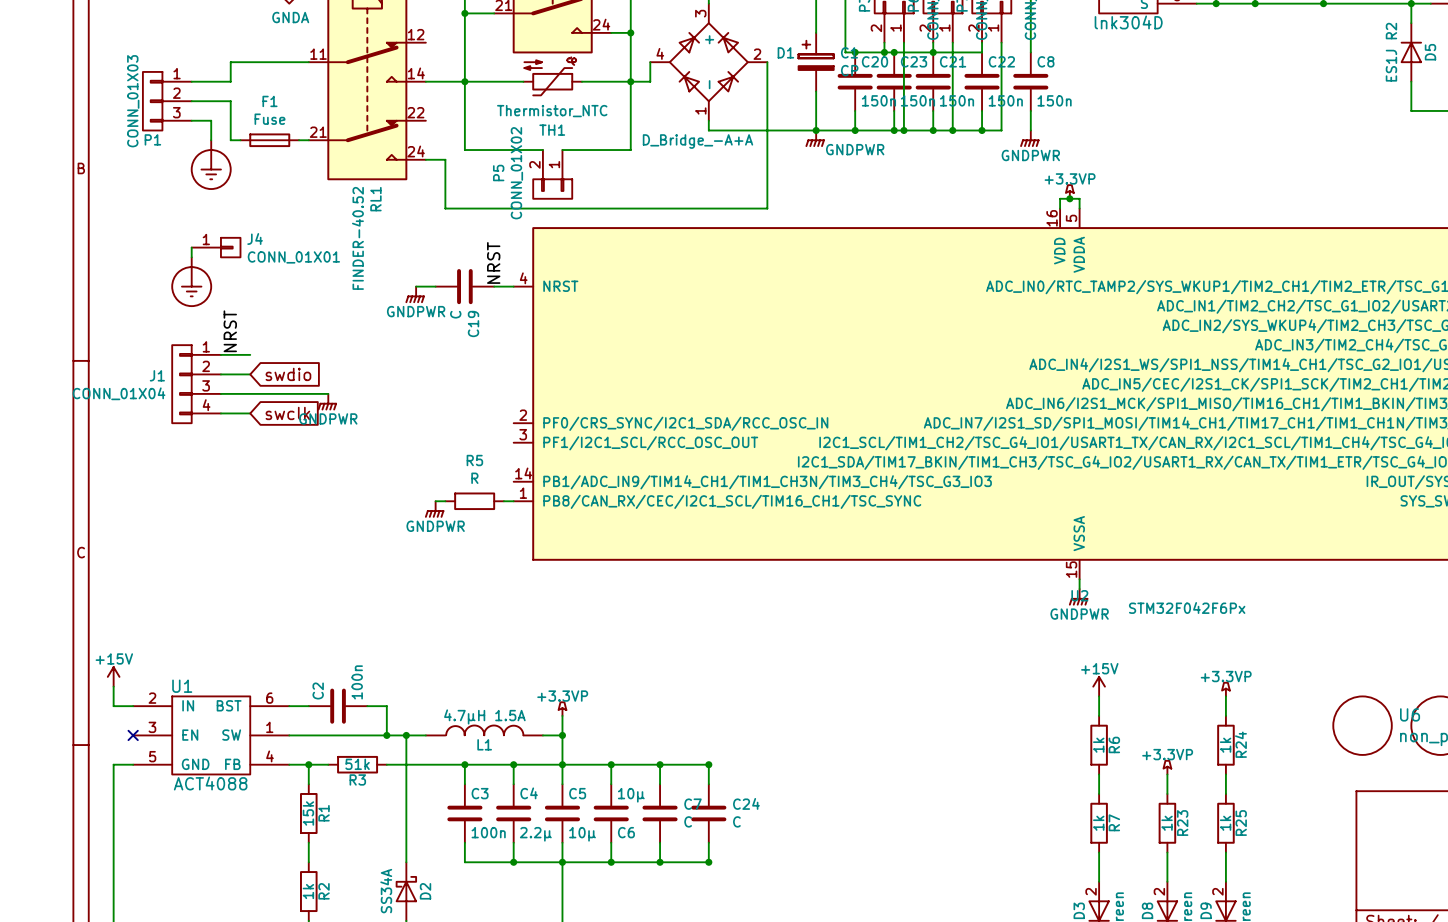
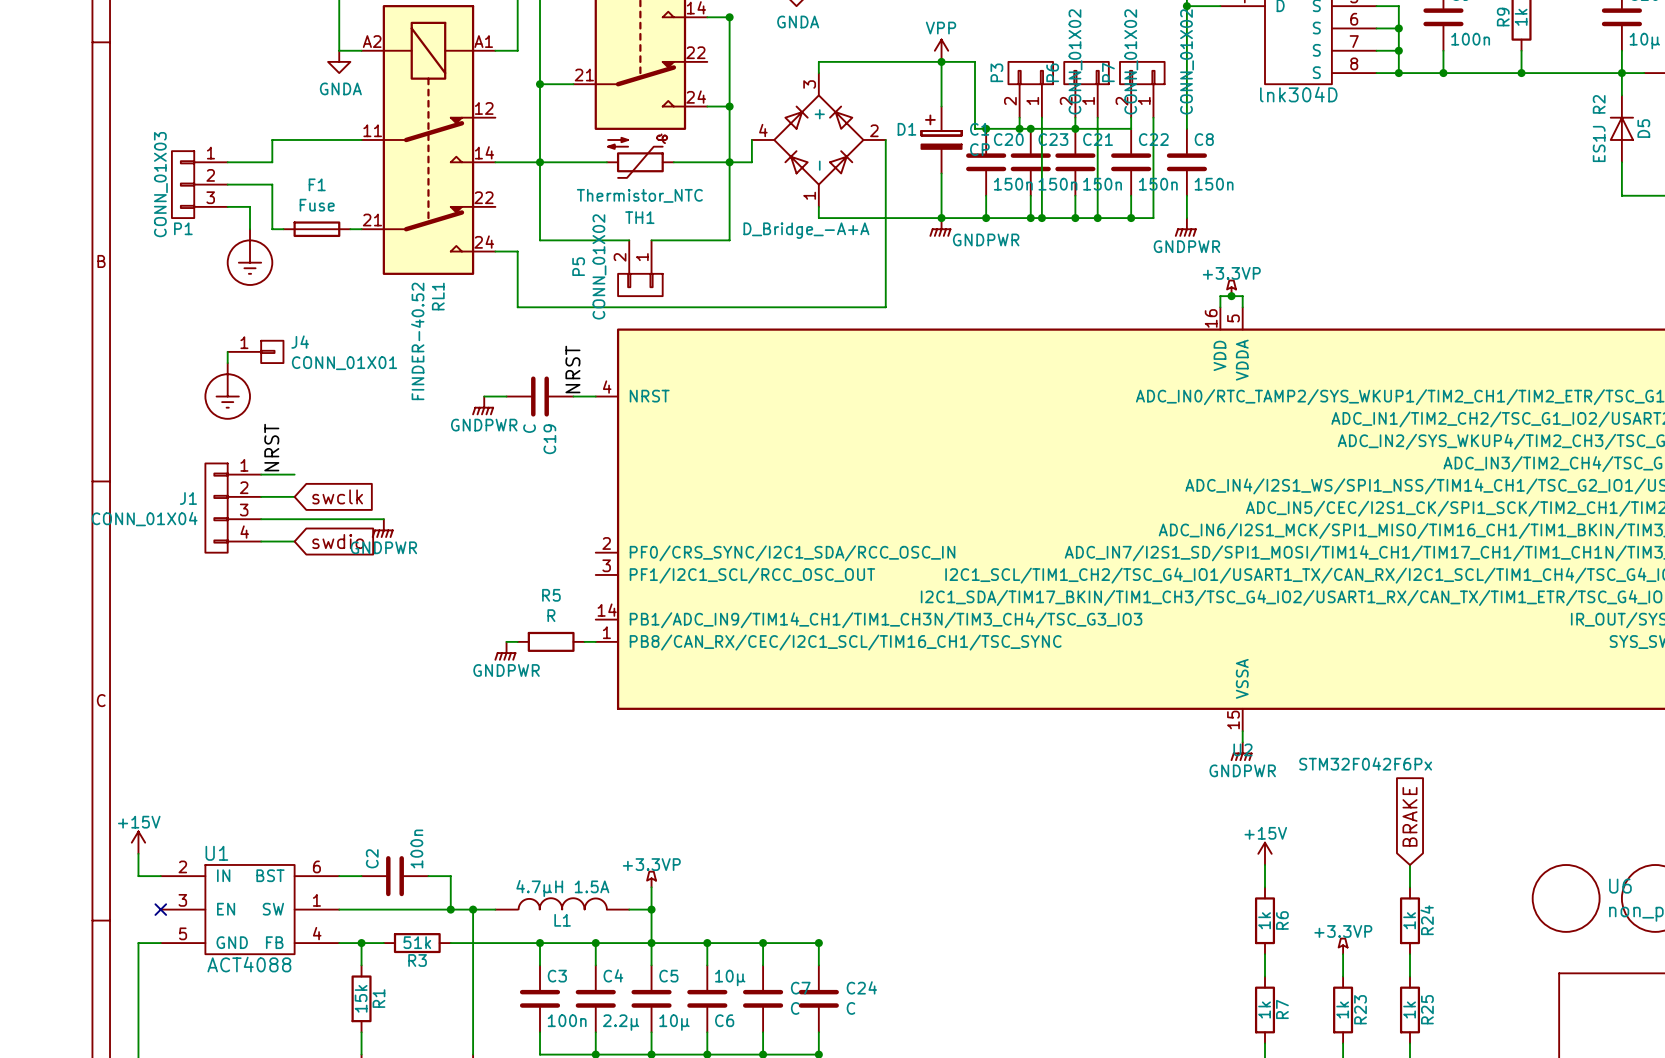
global label: swdio (288, 374) -> swclk (337, 496)
global label: swclk (287, 413) -> swdio (338, 541)
global label: none -> BRAKE (1409, 816)
power symbol: +3.3VP (1225, 689) -> none

